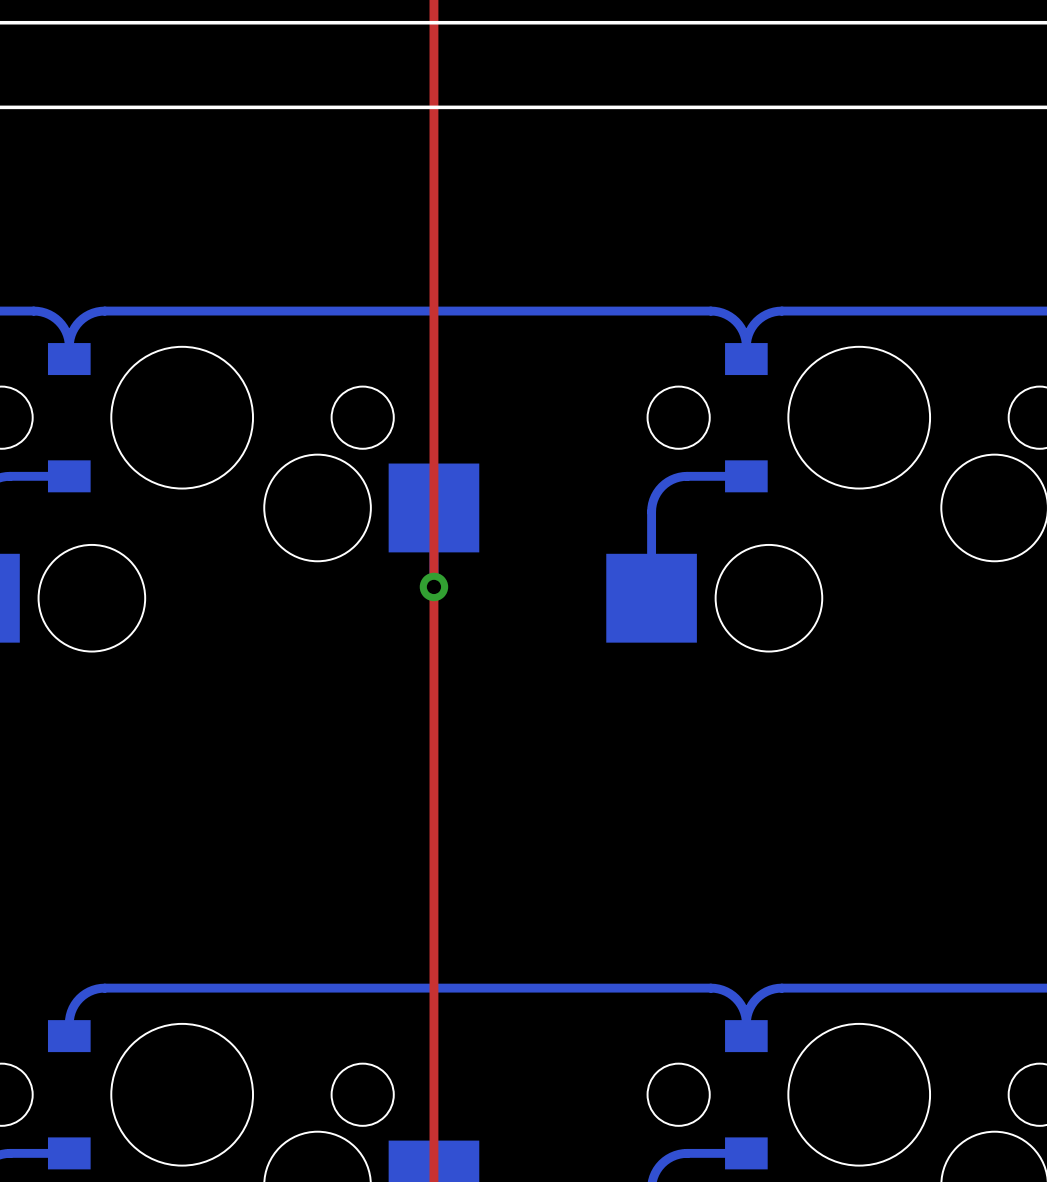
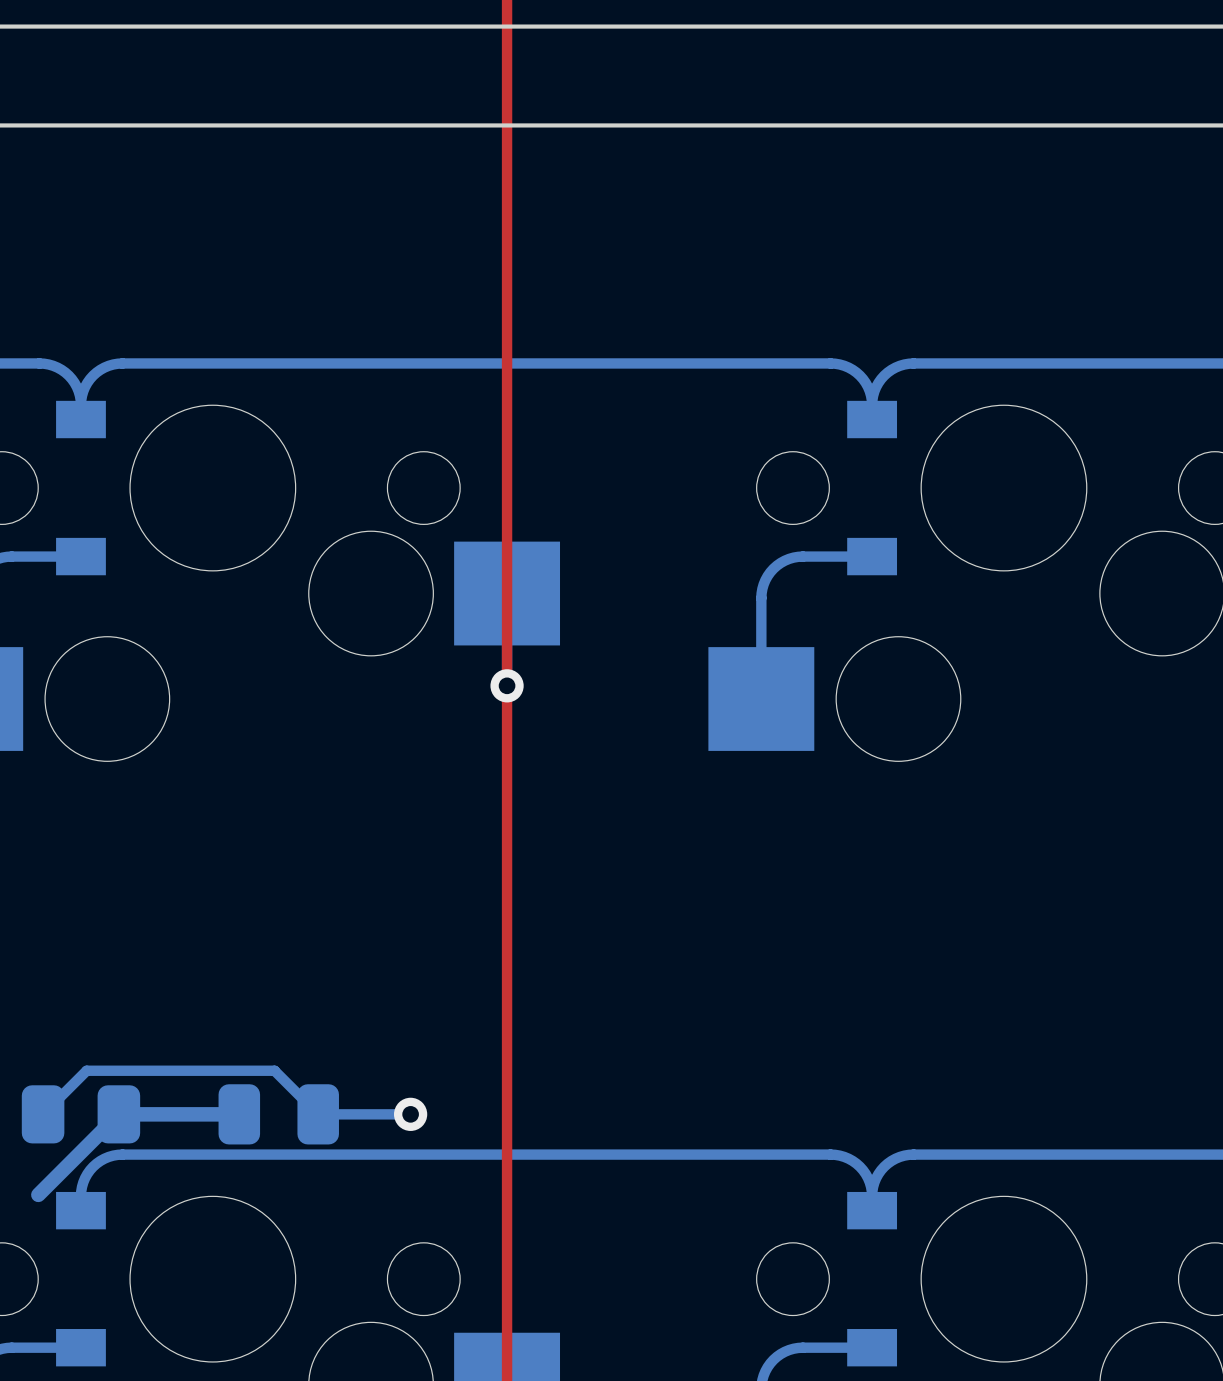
bottom track: none -> (43, 1114) (86, 1070) (274, 1070) (318, 1114) (410, 1114)
part: none -> (80, 1114)
bottom track: none -> (239, 1114) (118, 1114) (38, 1194)
part: none -> (278, 1114)
via: none -> (410, 1114)

